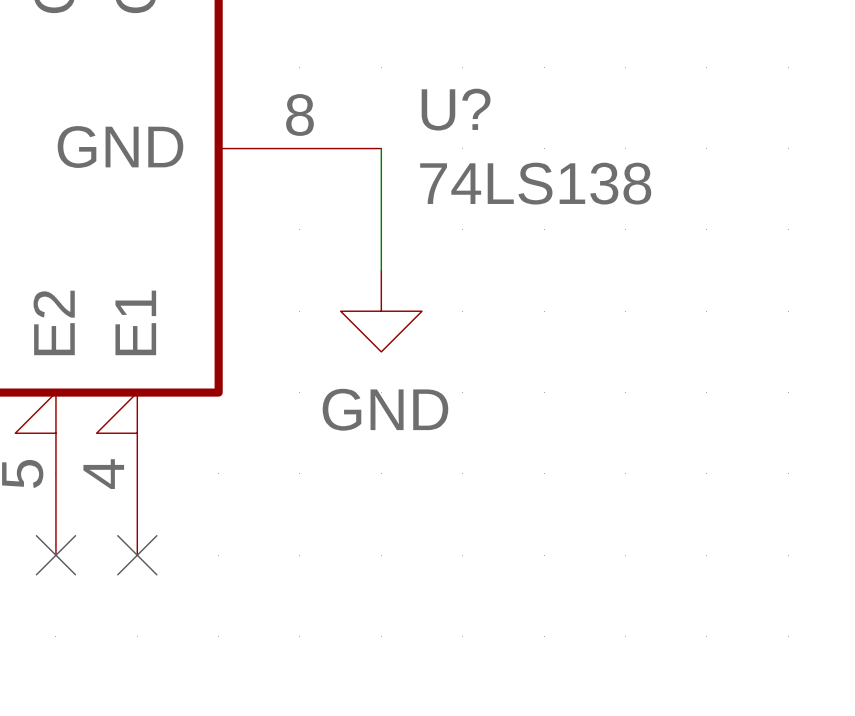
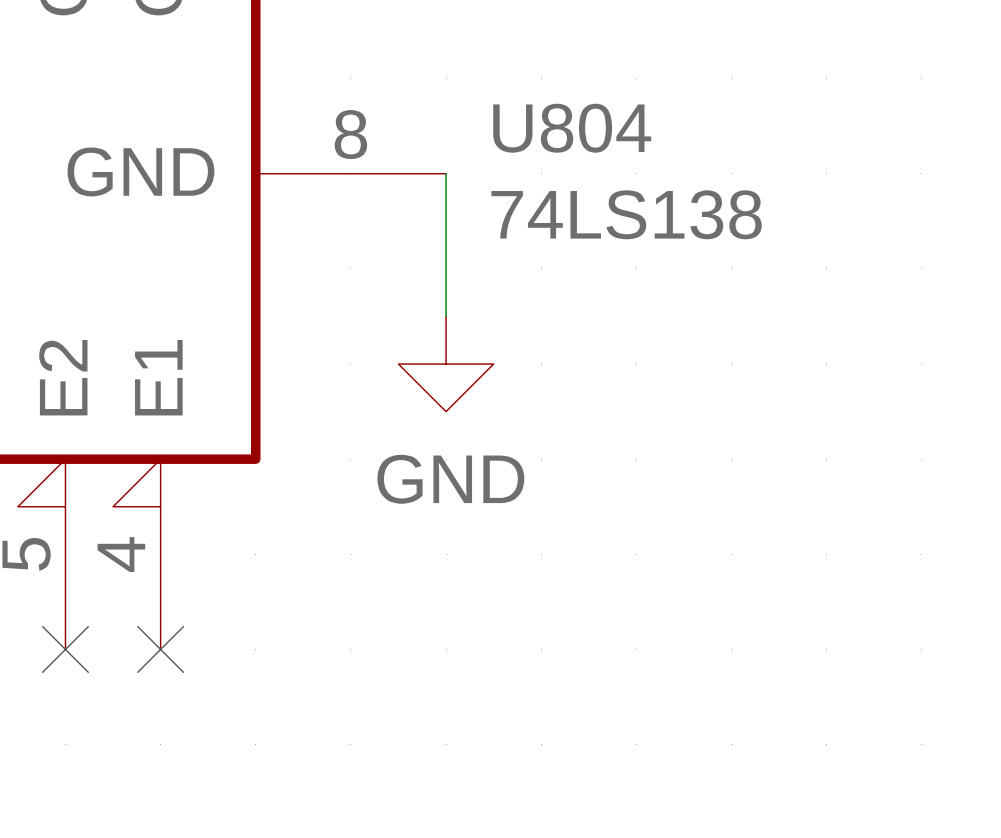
U? name: U? (456, 109) -> U804 (572, 128)

